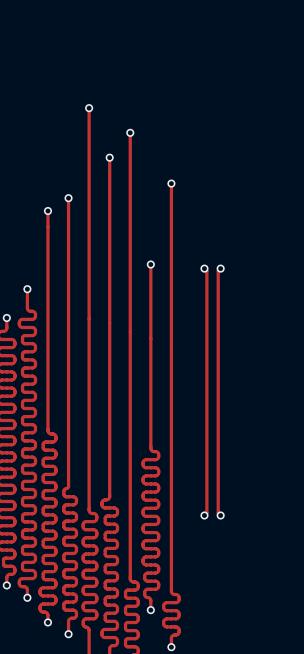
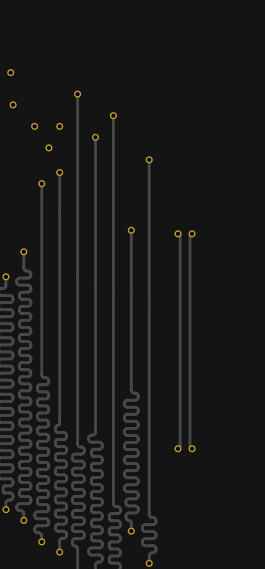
via: none -> (10, 72)
via: none -> (13, 104)
via: none -> (34, 126)
via: none -> (59, 126)
via: none -> (48, 147)

